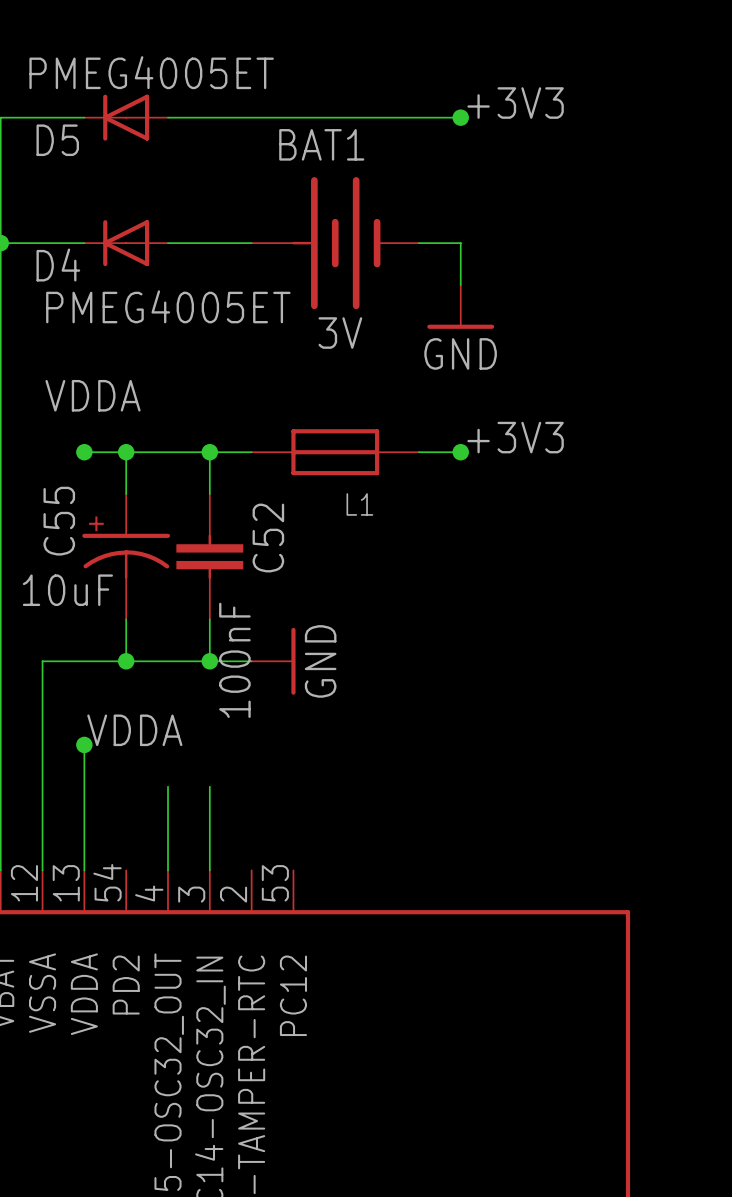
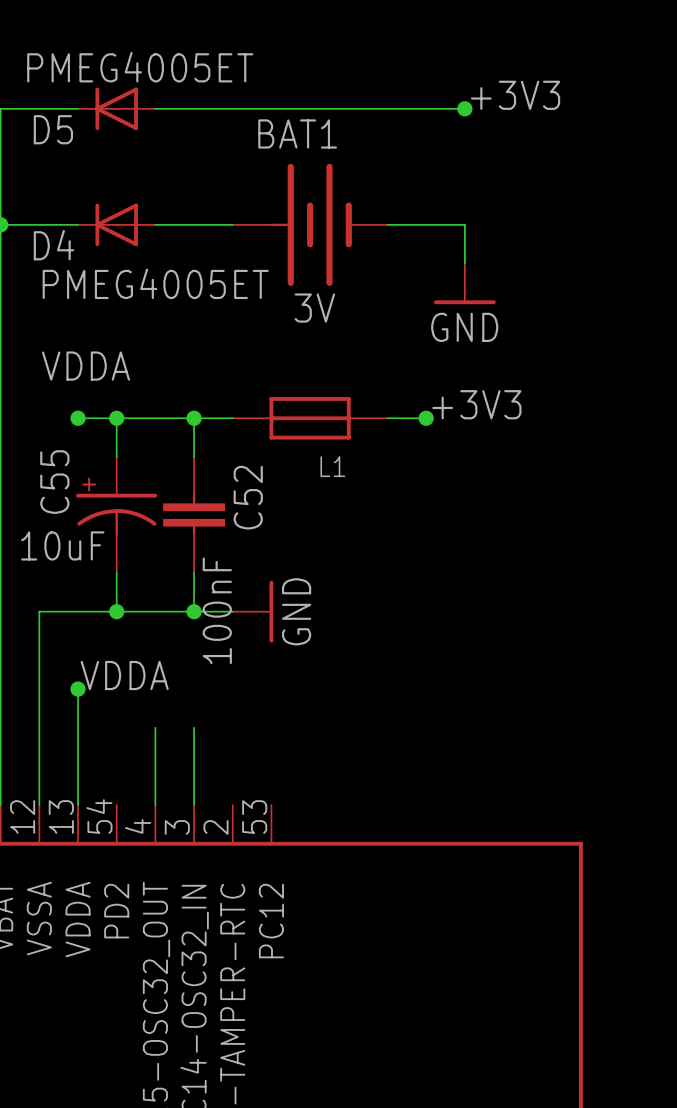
label position: +3V3 (515, 103) -> +3V3 (515, 95)
wire: none -> (426, 108) (464, 108)
junction position: (460, 117) -> (464, 108)
wire: (460, 243) (460, 284) -> (426, 224) (464, 224) (464, 263)
power symbol position: GND (460, 306) -> GND (464, 283)

